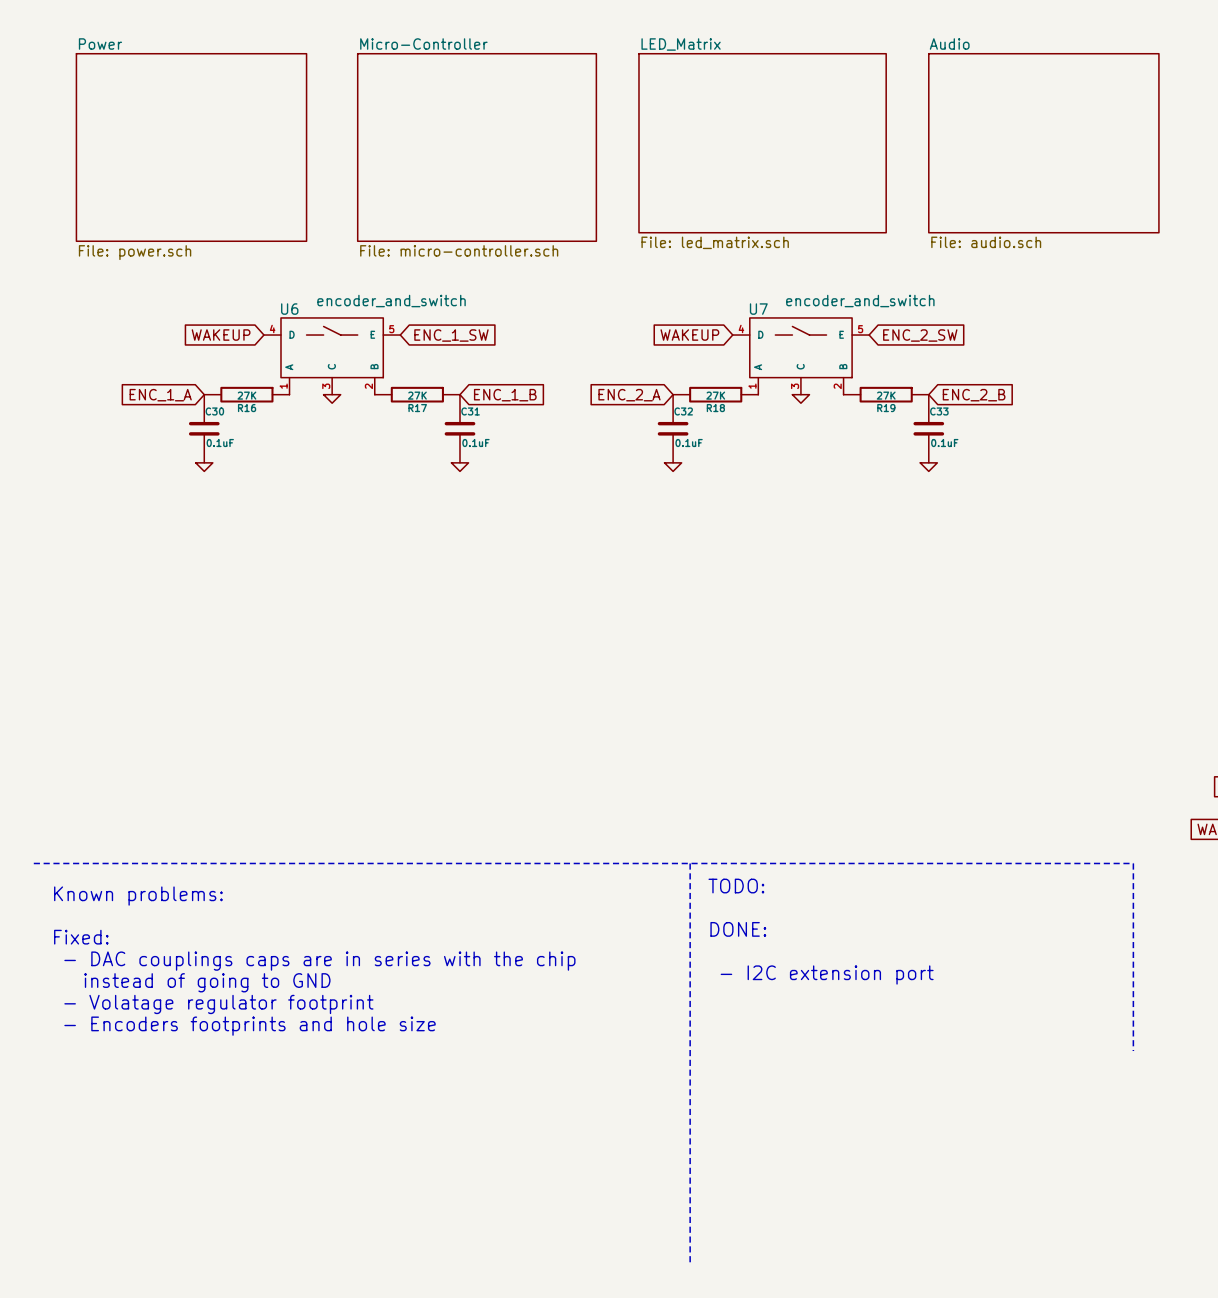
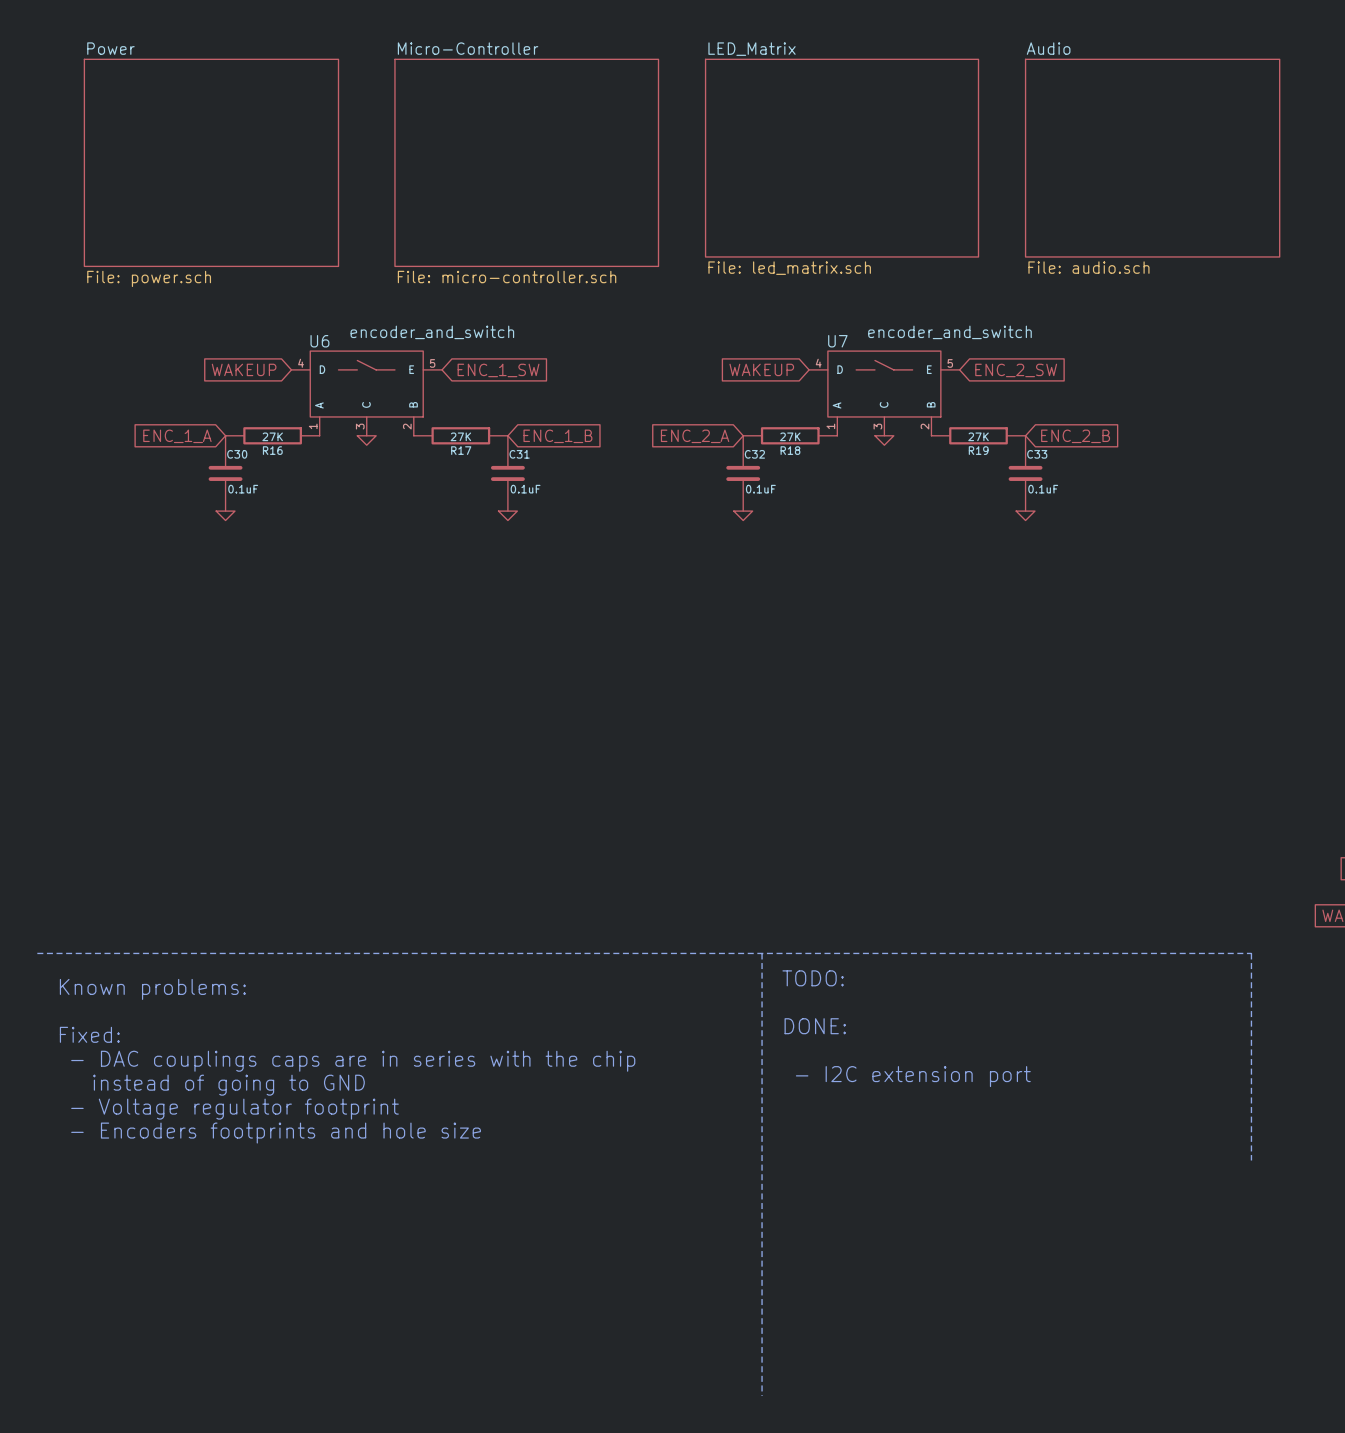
text: - Volatage regulator footprint (218, 1004) -> - Voltage regulator footprint (234, 1109)

